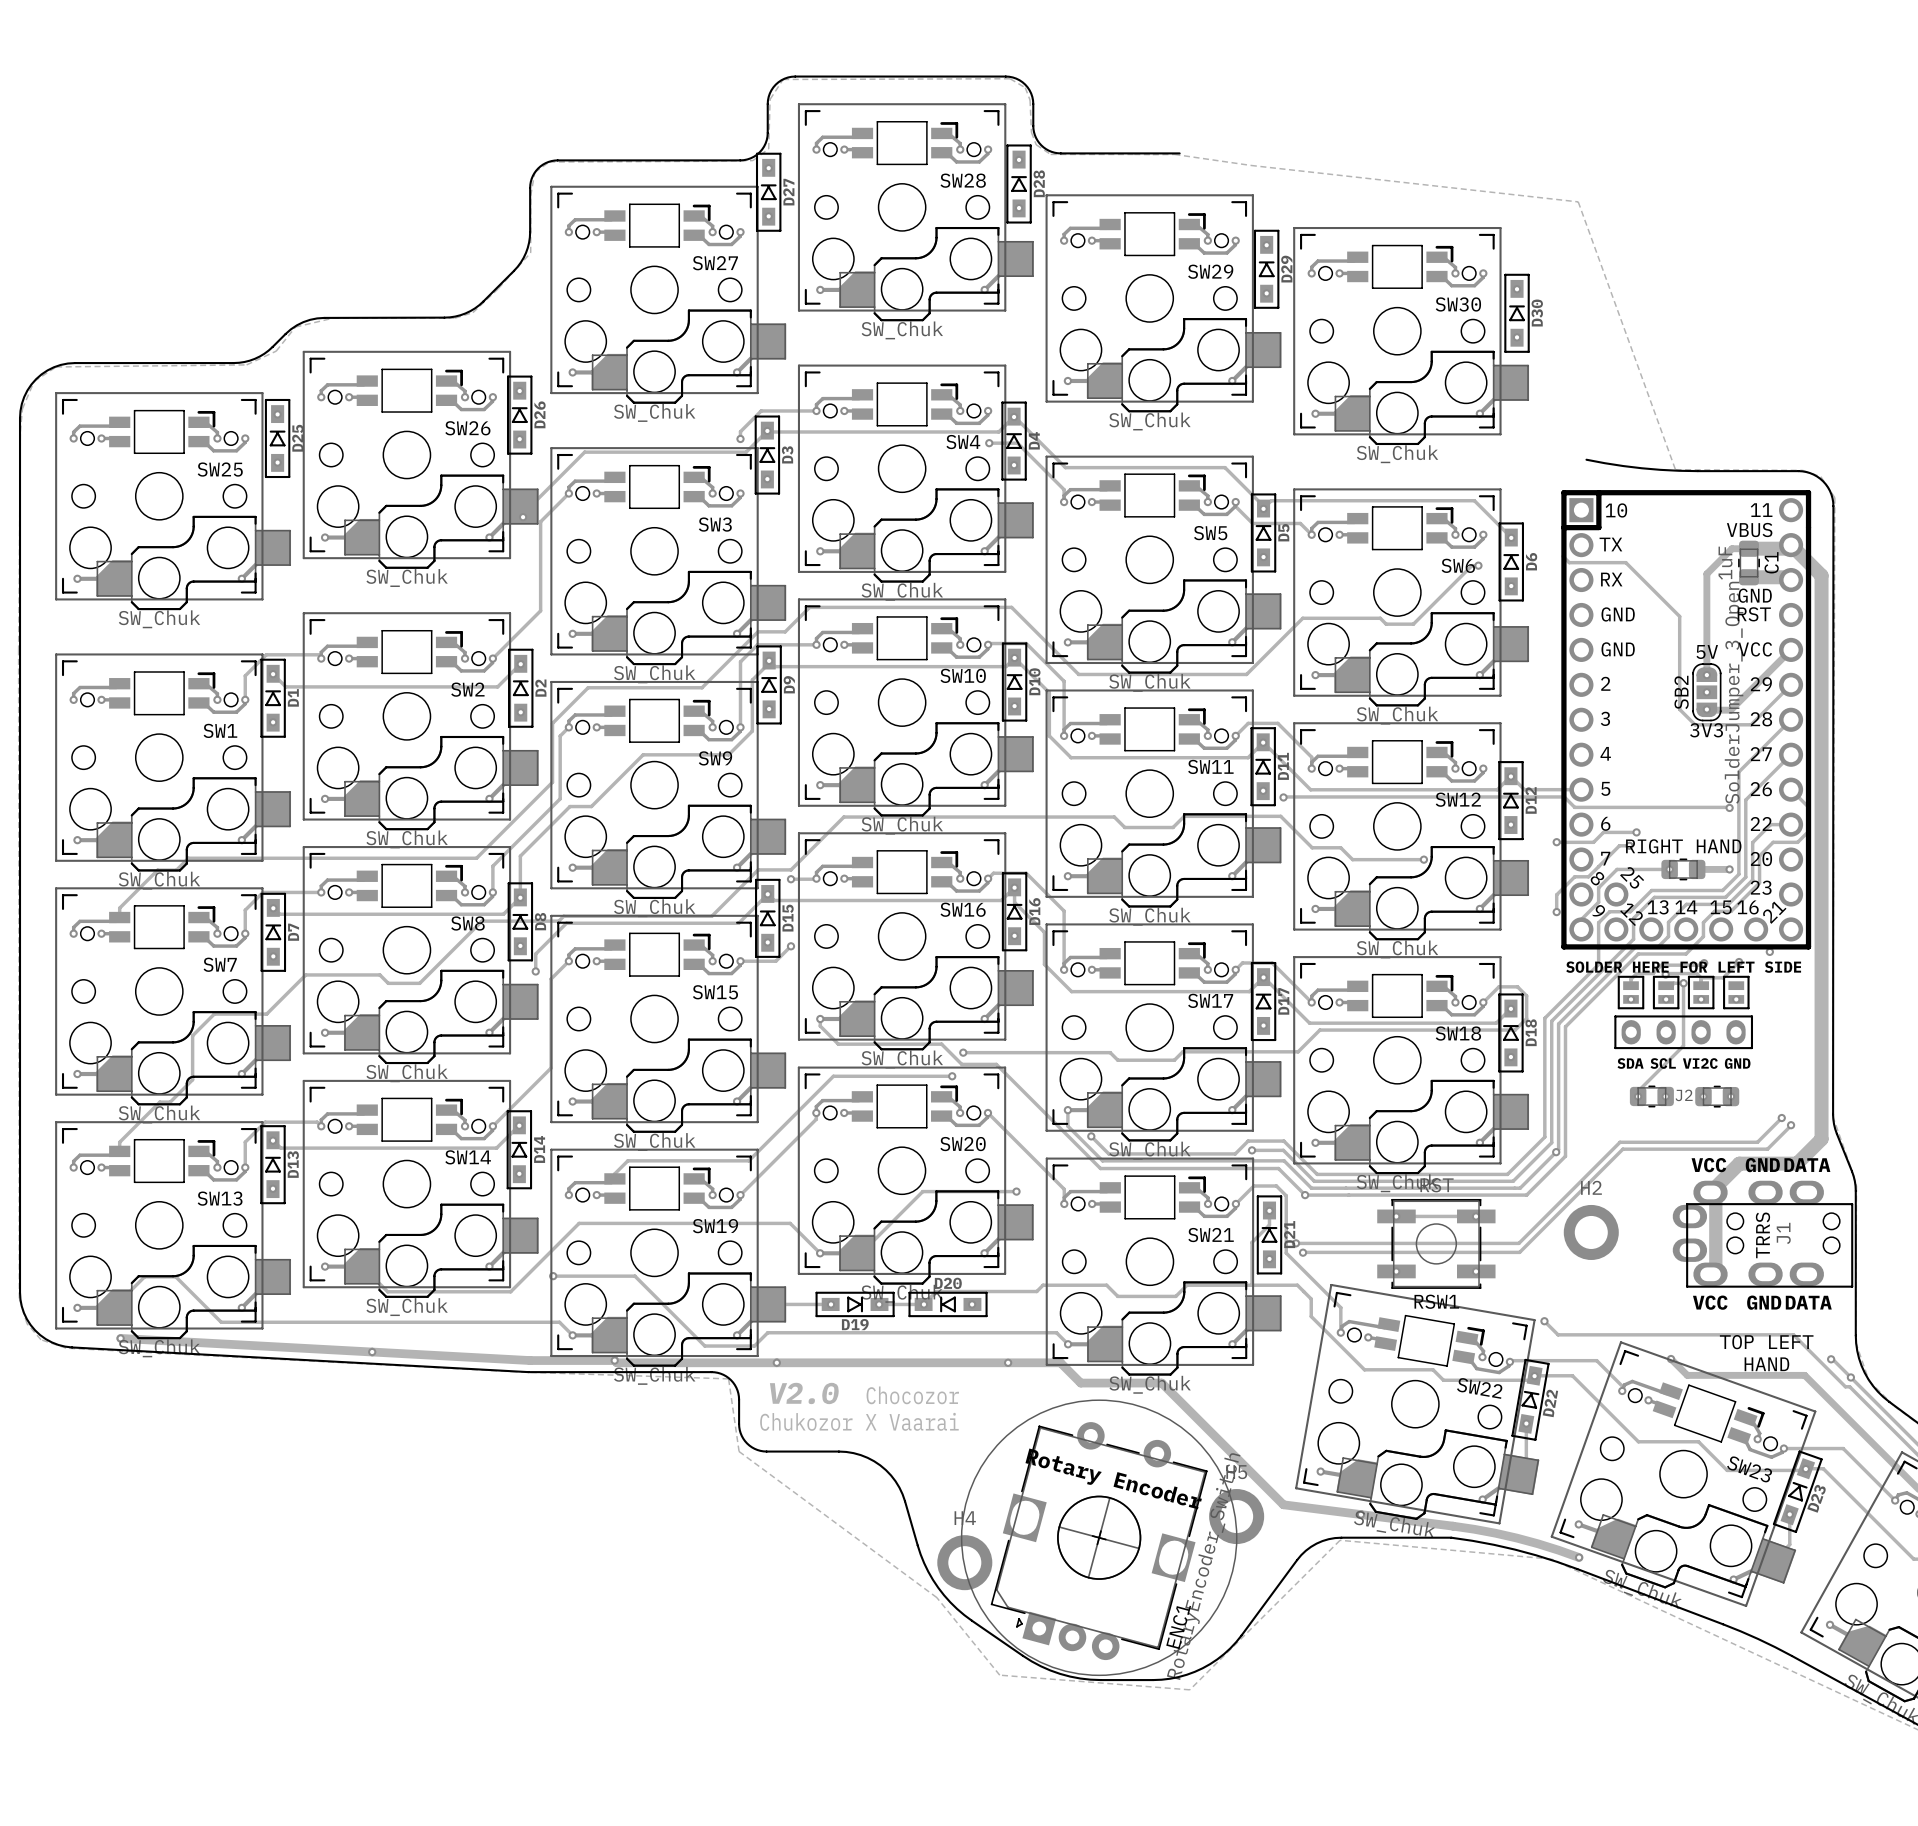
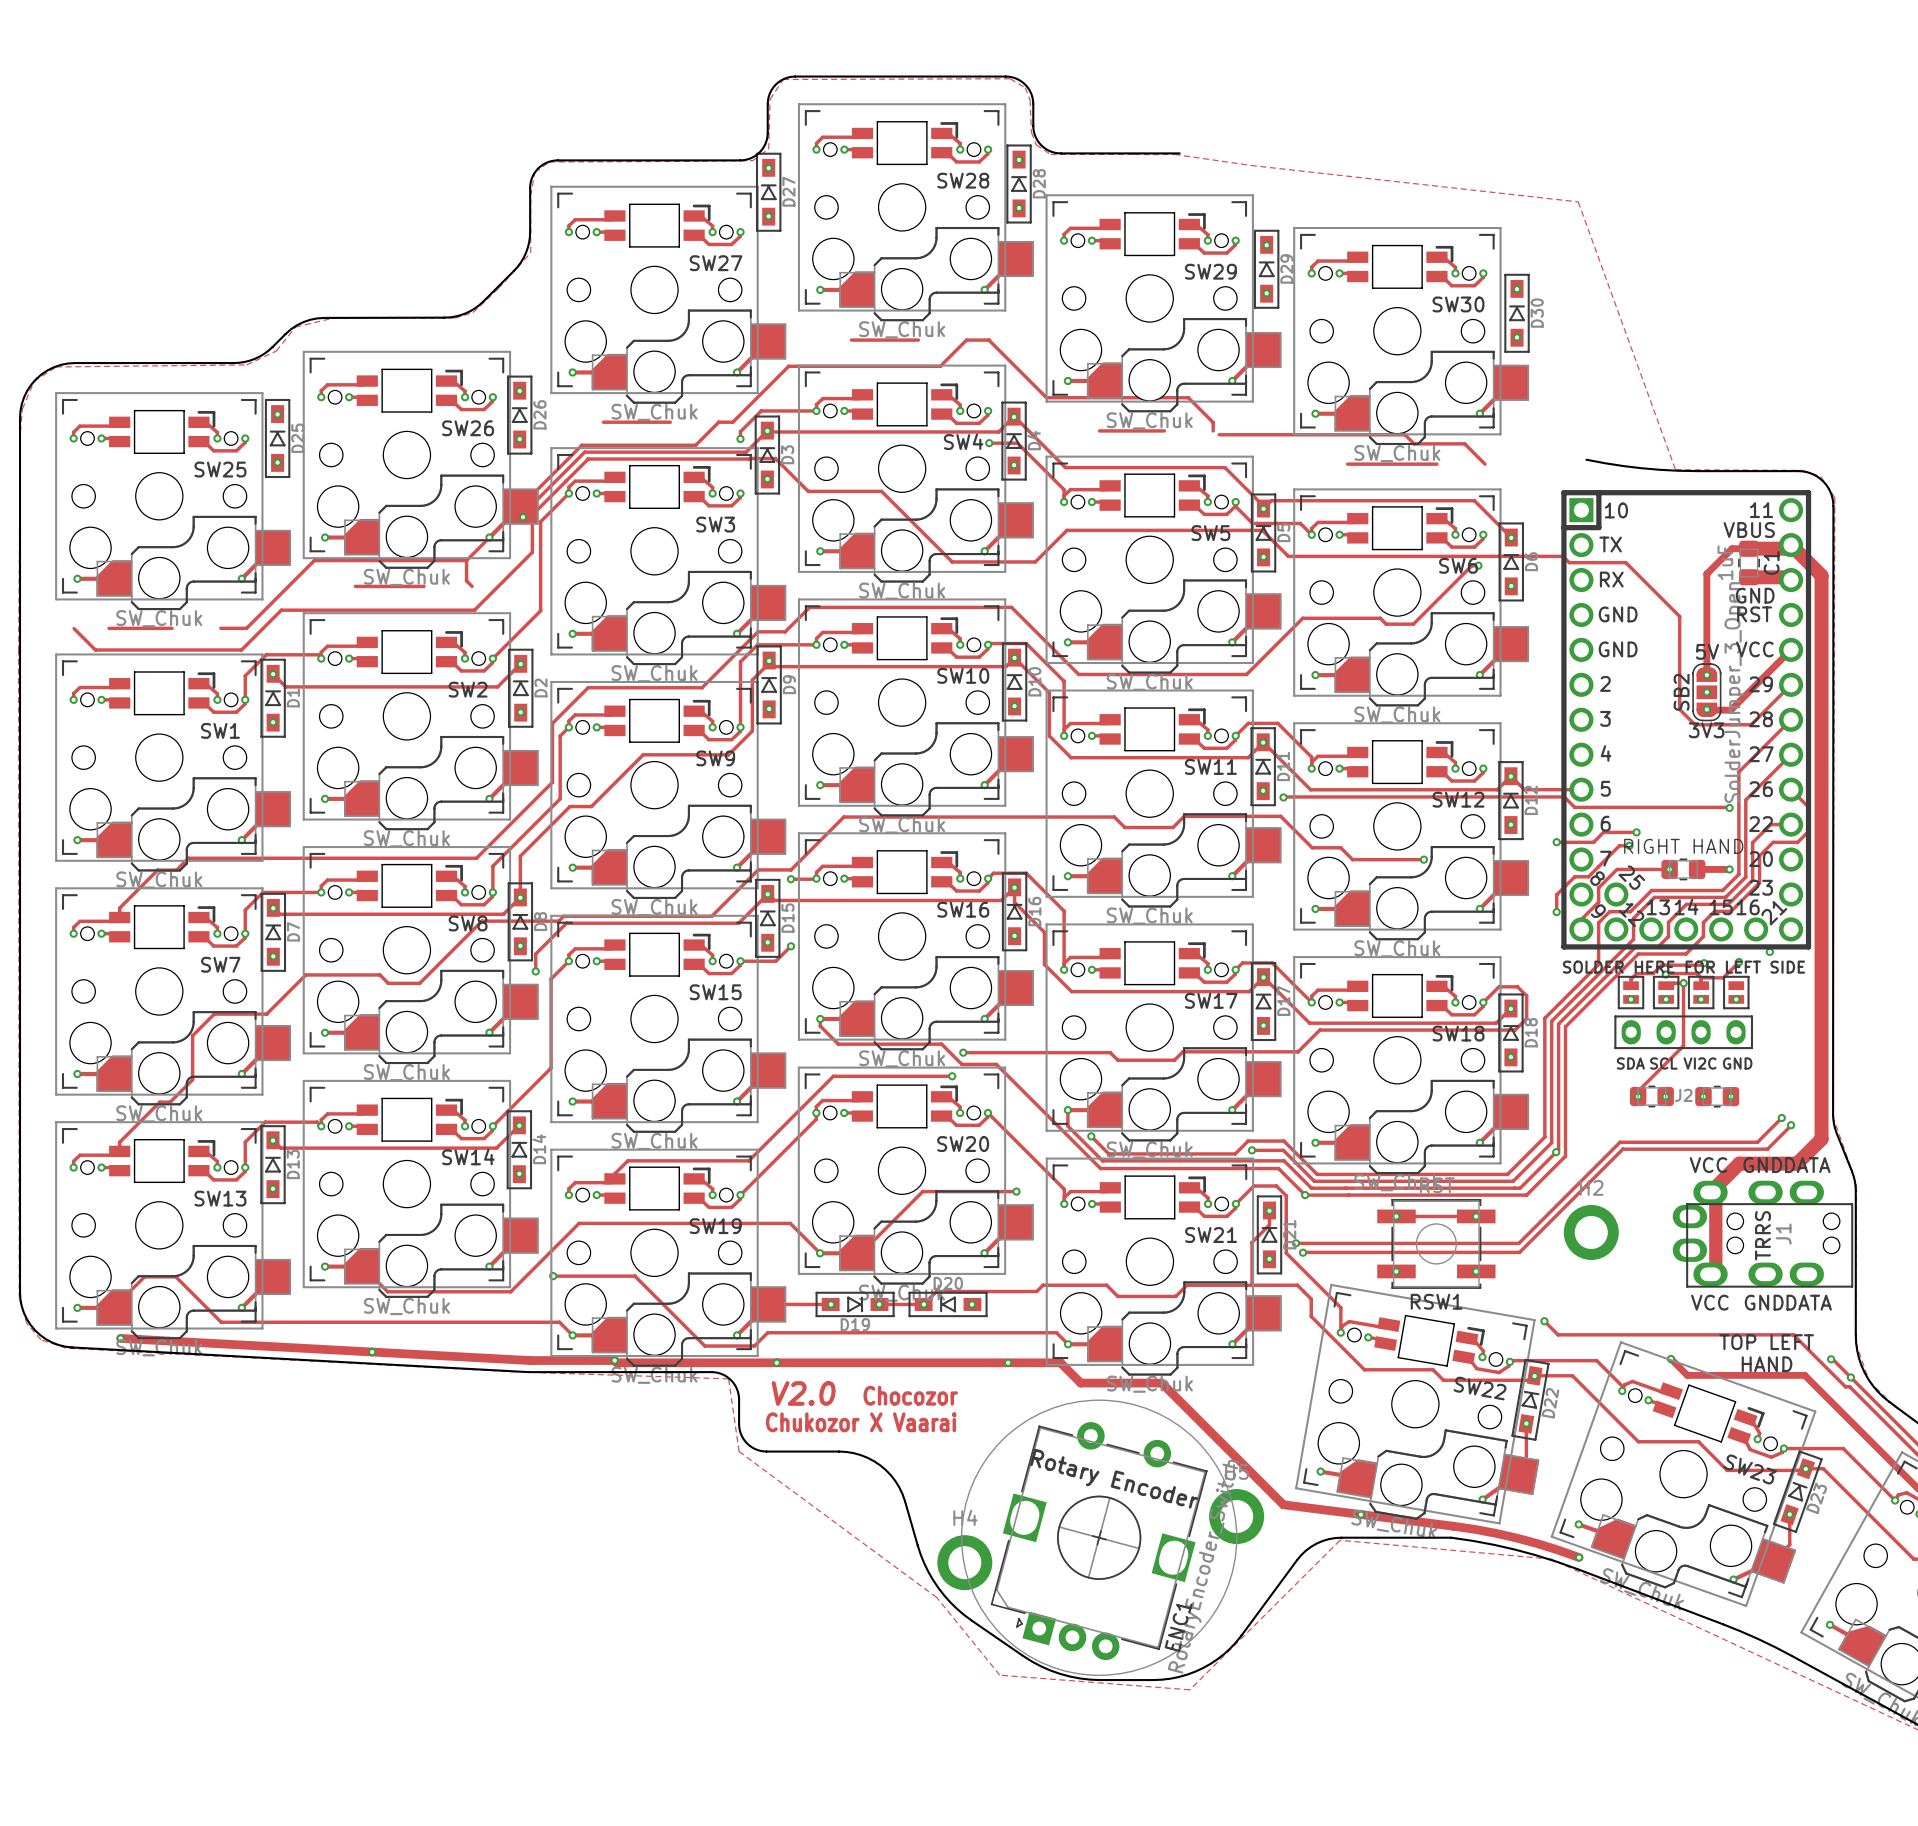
track: none -> (851, 340) (918, 340)
track: none -> (966, 340) (940, 366) (788, 366) (732, 422) (718, 422) (695, 445) (581, 445) (466, 560)
track: none -> (966, 340) (988, 340) (1046, 397) (1188, 397) (1213, 422) (1213, 430)
track: none -> (603, 422) (670, 422)
track: none -> (1099, 430) (1164, 430)
track: none -> (1219, 434) (1405, 434) (1414, 443) (1464, 443) (1485, 464)
track: none -> (1347, 464) (1436, 464)
track: none -> (1562, 556) (1288, 556) (1262, 530) (1066, 530) (1035, 561) (952, 561) (881, 491) (808, 491) (775, 458) (588, 459) (532, 514) (532, 552) (474, 610) (281, 610) (241, 650) (95, 650) (74, 628)
track: none -> (466, 560) (466, 580) (472, 586)
track: none -> (466, 560) (314, 560) (246, 628) (220, 628)
track: none -> (355, 586) (423, 586)
track: none -> (109, 628) (172, 628)

